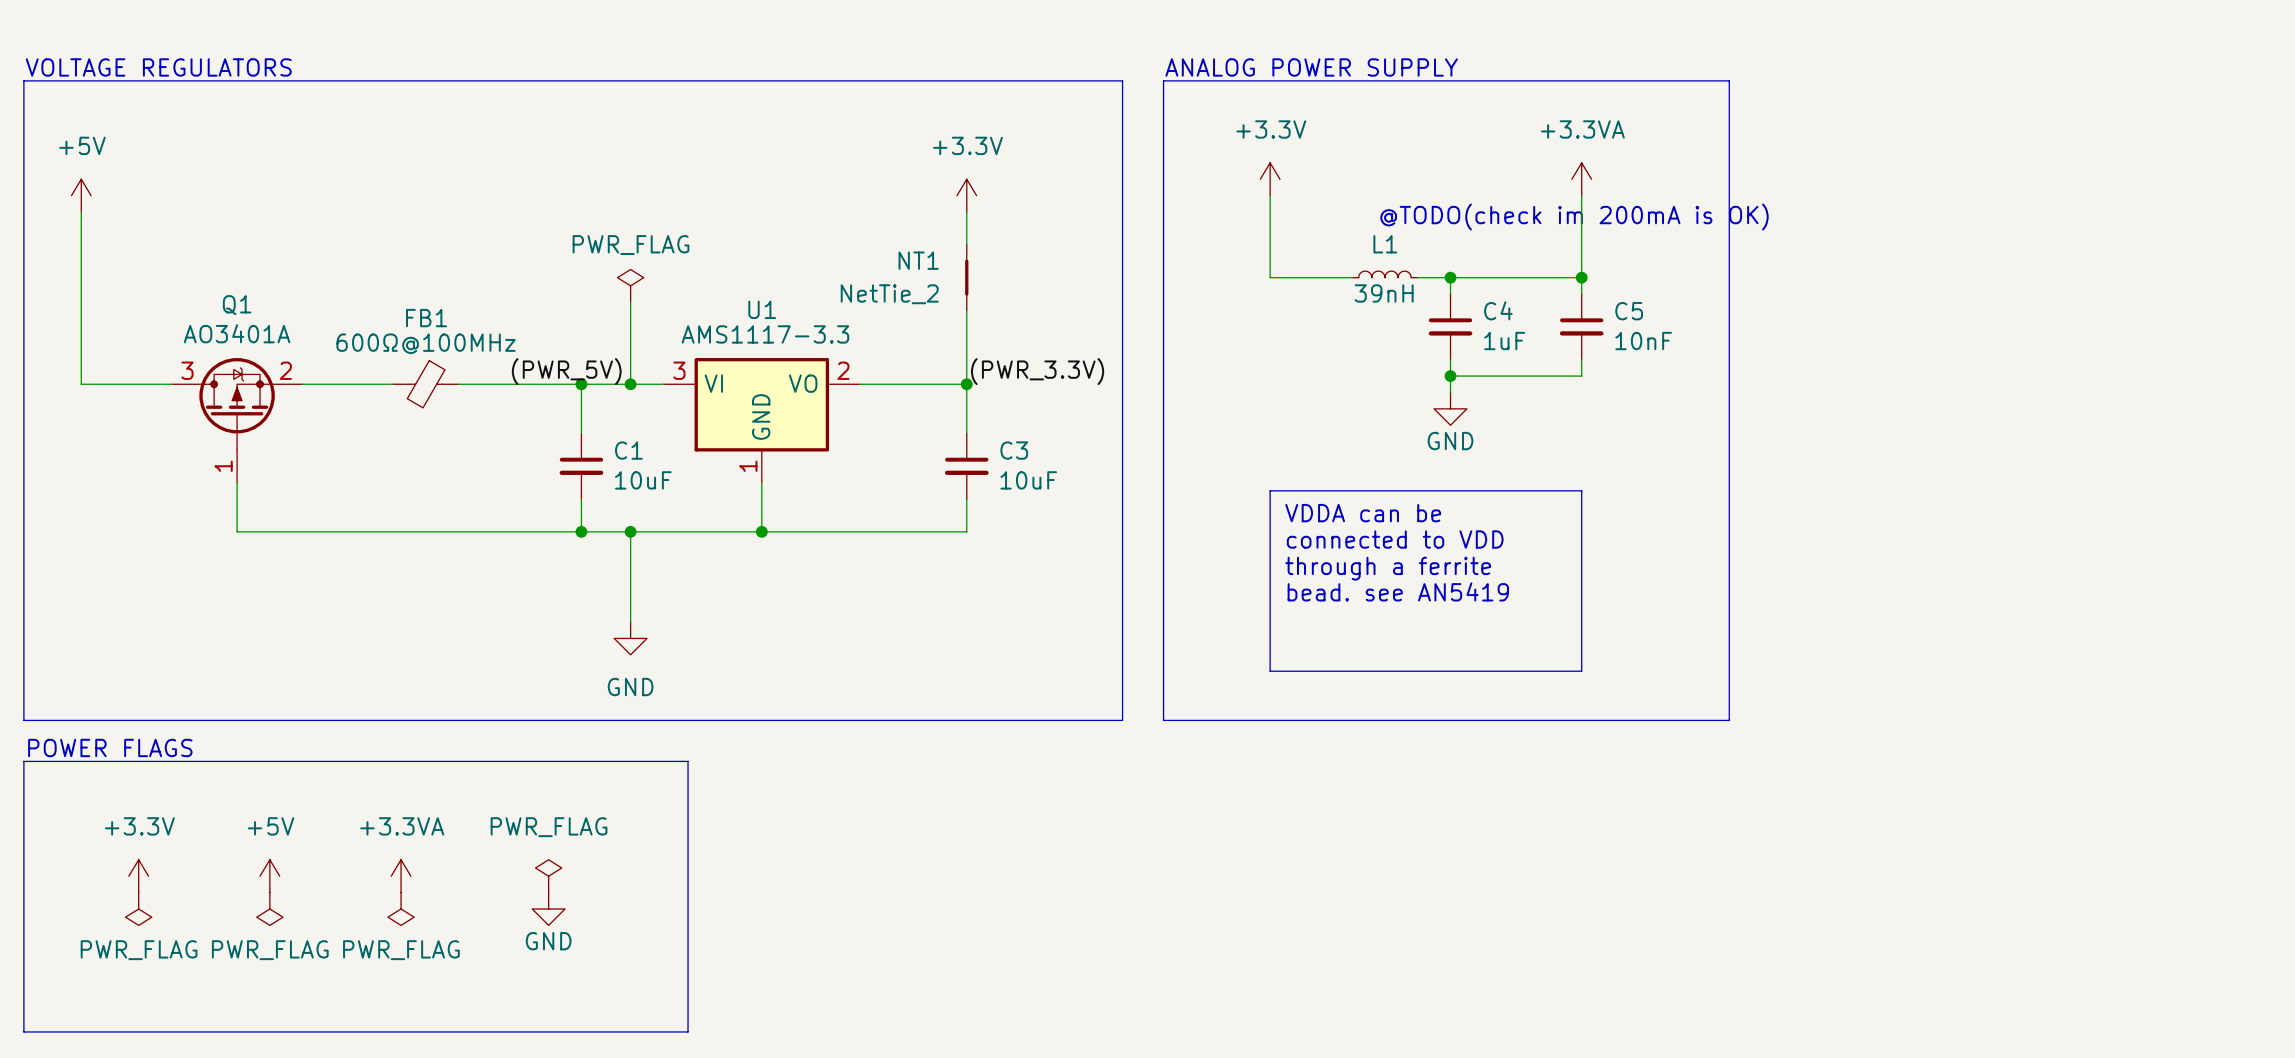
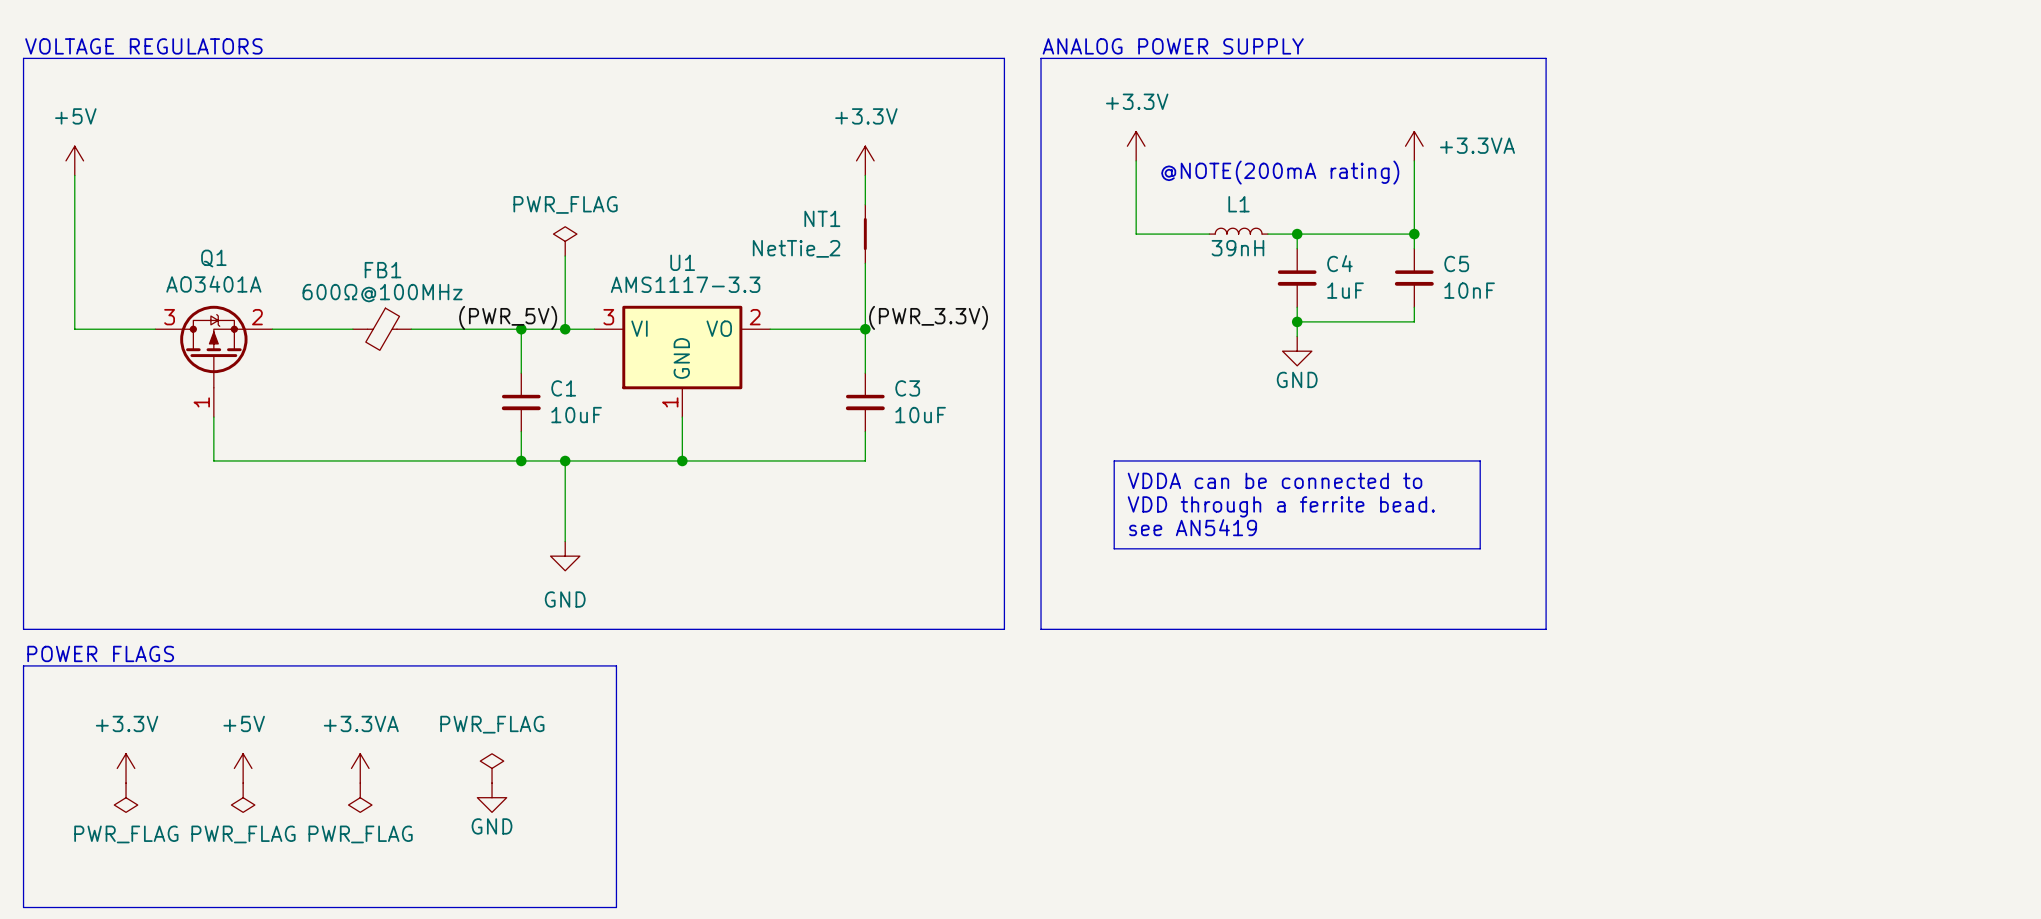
power symbol text position: +3.3VA (1582, 129) -> +3.3VA (1477, 145)
text: none -> @NOTE(200mA rating) (1280, 172)
text: @TODO(check im 200mA is OK) (1574, 217) -> none
line: (1270, 490) (1581, 490) (1581, 671) (1270, 671) (1270, 490) -> none
text: VDDA can be (1363, 513) -> none
line: none -> (1114, 460) (1480, 460) (1480, 548) (1114, 548) (1114, 460)
text: connected to VDD (1395, 539) -> none
text: none -> VDDA can be connected to (1275, 480)
text: through a ferrite (1388, 568) -> VDD through a ferrite bead. (1281, 506)
text: bead. see AN5419 (1398, 591) -> see AN5419 (1193, 527)

